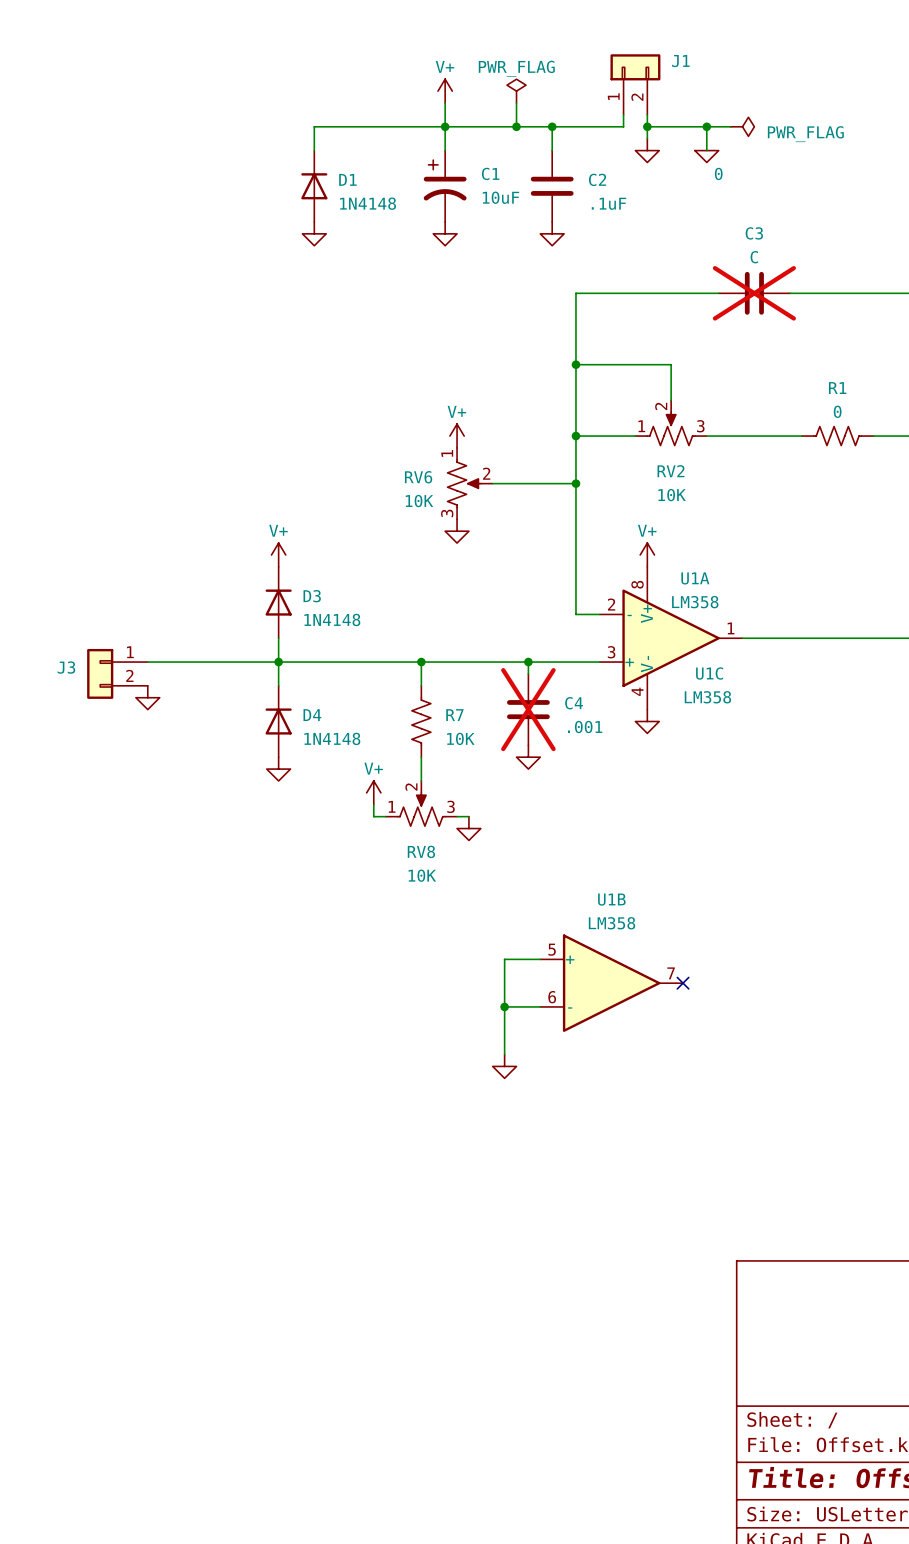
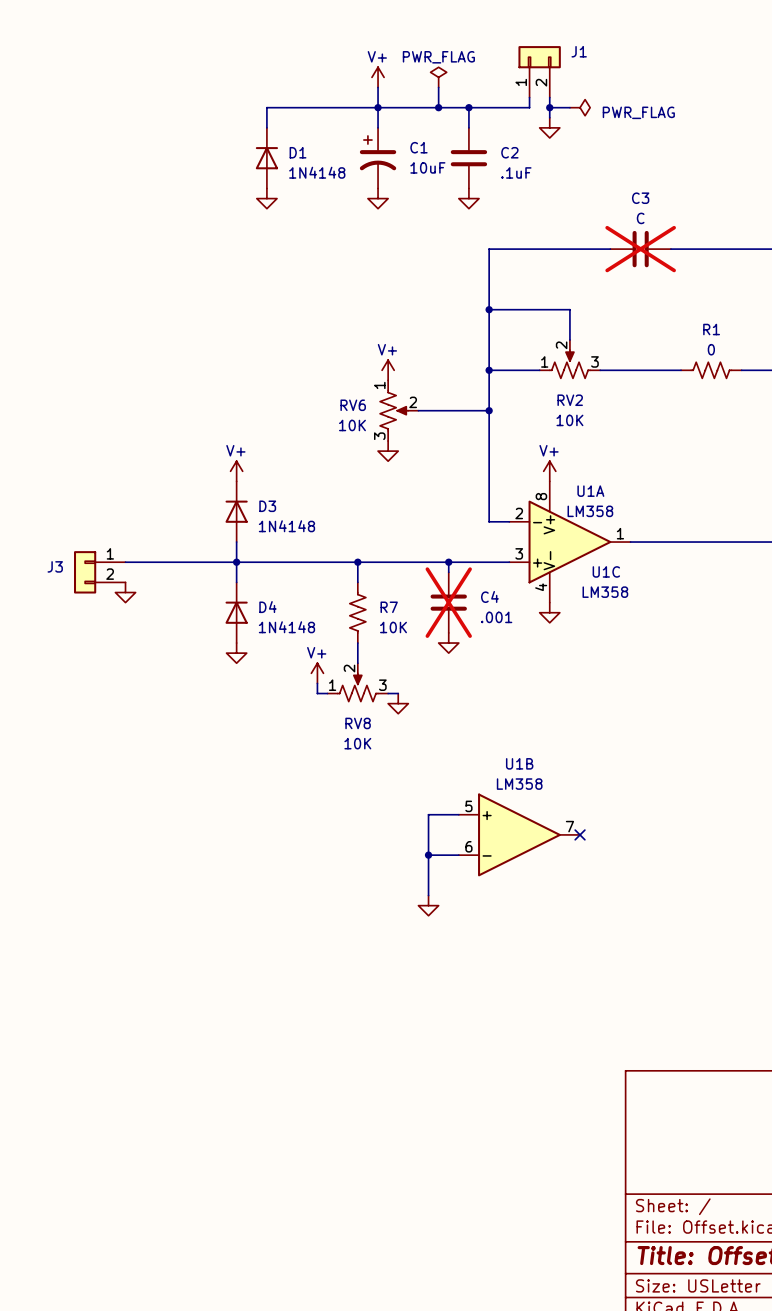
wire: (671, 126) (730, 126) -> none
wire: (706, 126) (706, 150) -> none
junction: (706, 126) -> none
power symbol position: PWR_FLAG (742, 126) -> PWR_FLAG (580, 107)
power symbol: 0 (706, 156) -> none

